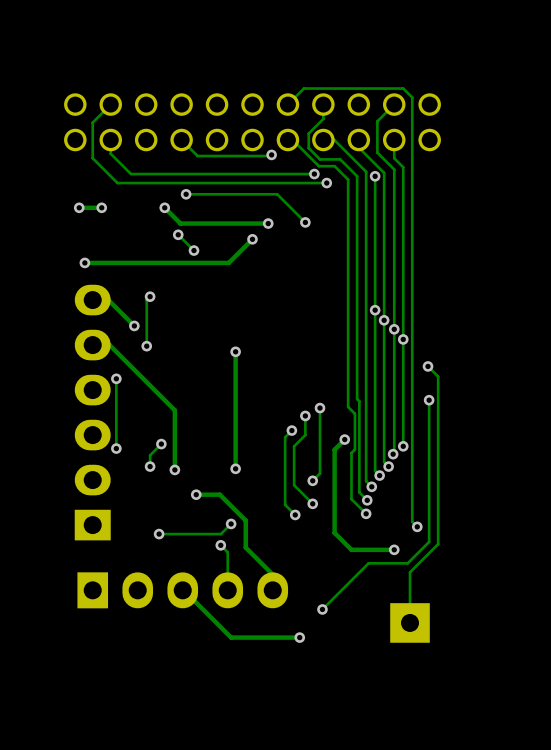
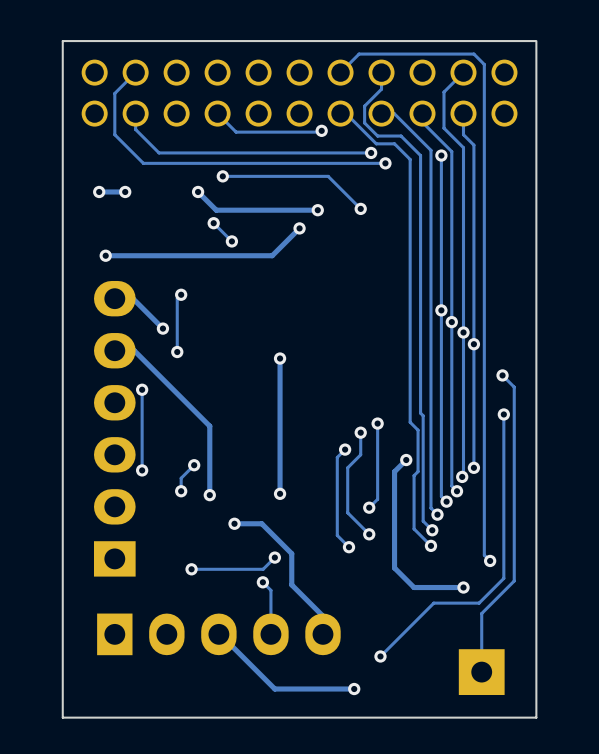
board edge: none -> (536, 41) (536, 717) (62, 717) (62, 41) (535, 41)

